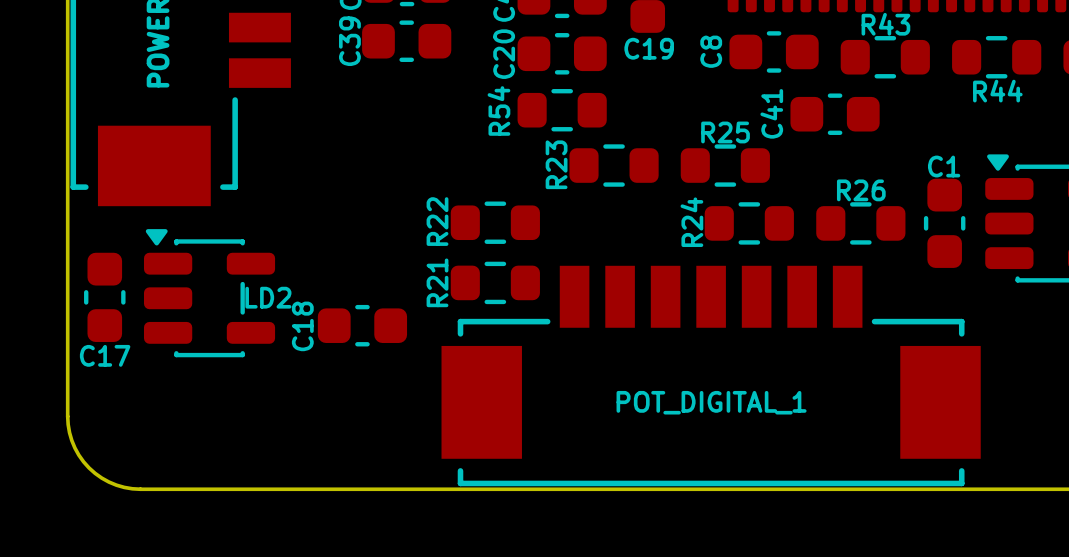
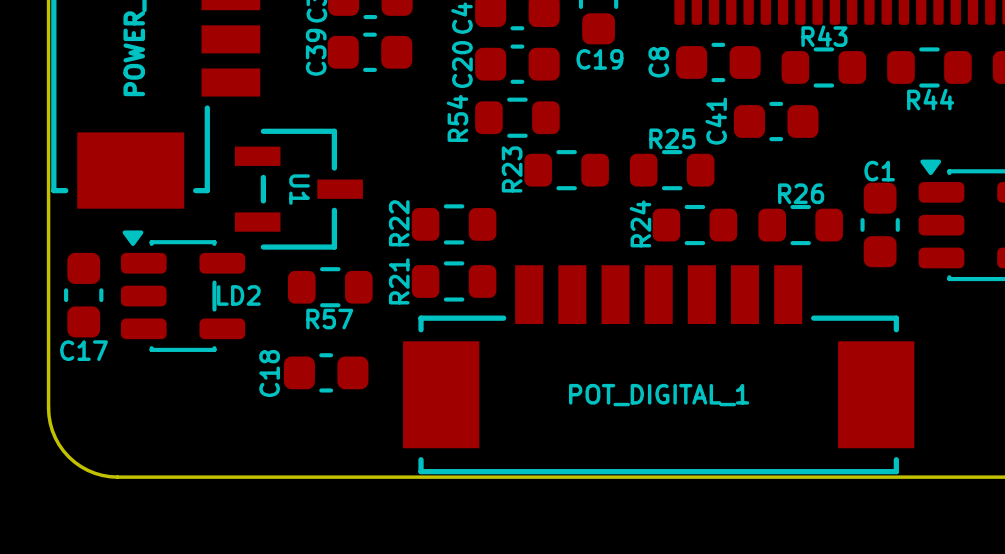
U1: none -> (298, 189)
R57: none -> (330, 287)
C18 position: (362, 325) -> (326, 372)

